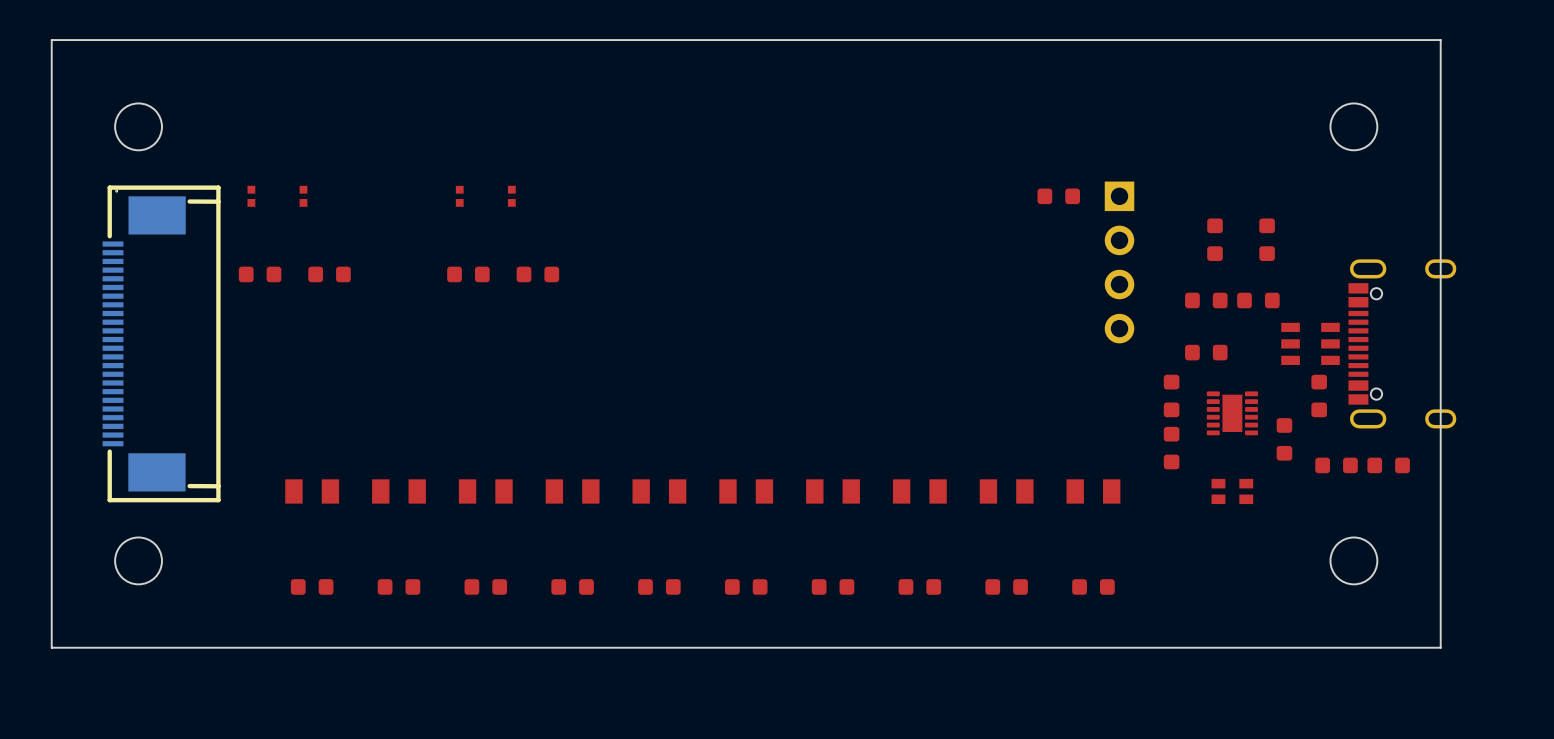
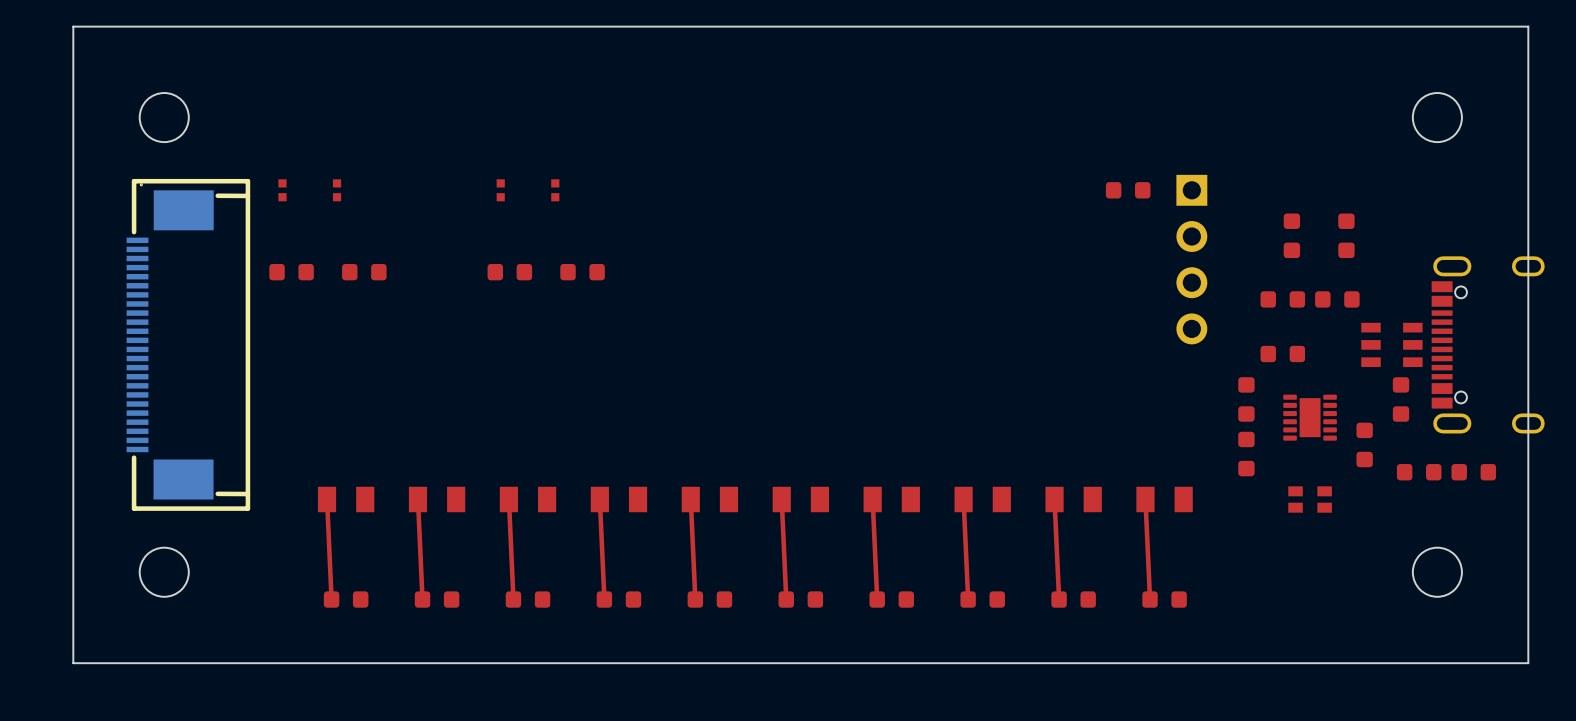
top track: none -> (327, 499) (331, 599)
top track: none -> (417, 499) (422, 599)
top track: none -> (508, 499) (513, 599)
top track: none -> (599, 499) (604, 599)
top track: none -> (690, 499) (695, 599)
top track: none -> (781, 499) (786, 599)
top track: none -> (872, 499) (877, 599)
top track: none -> (963, 499) (968, 599)
top track: none -> (1054, 499) (1059, 599)
top track: none -> (1145, 499) (1150, 599)

